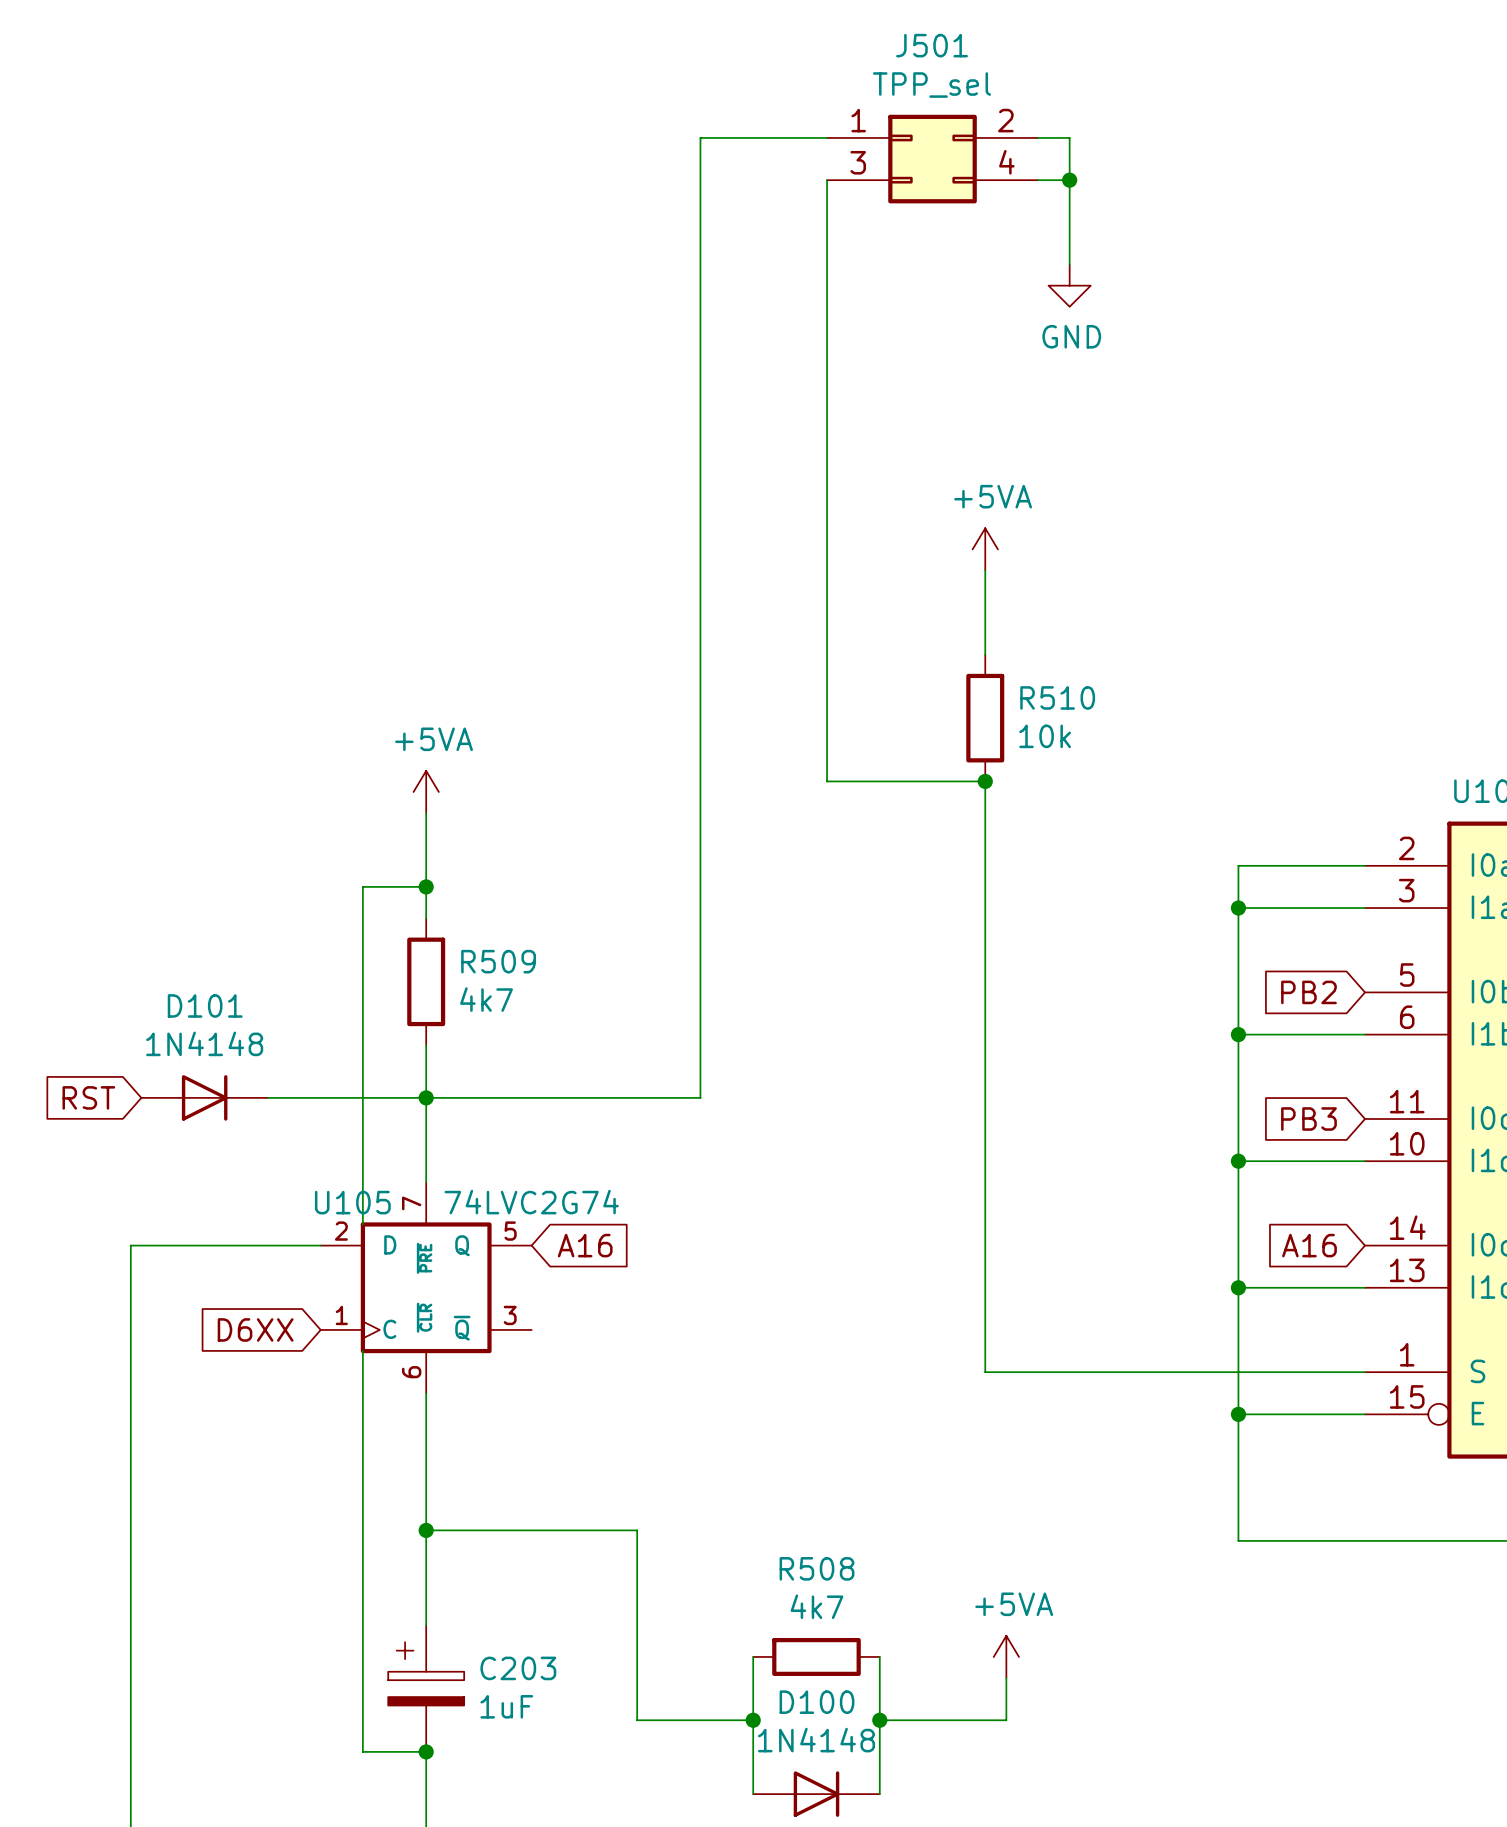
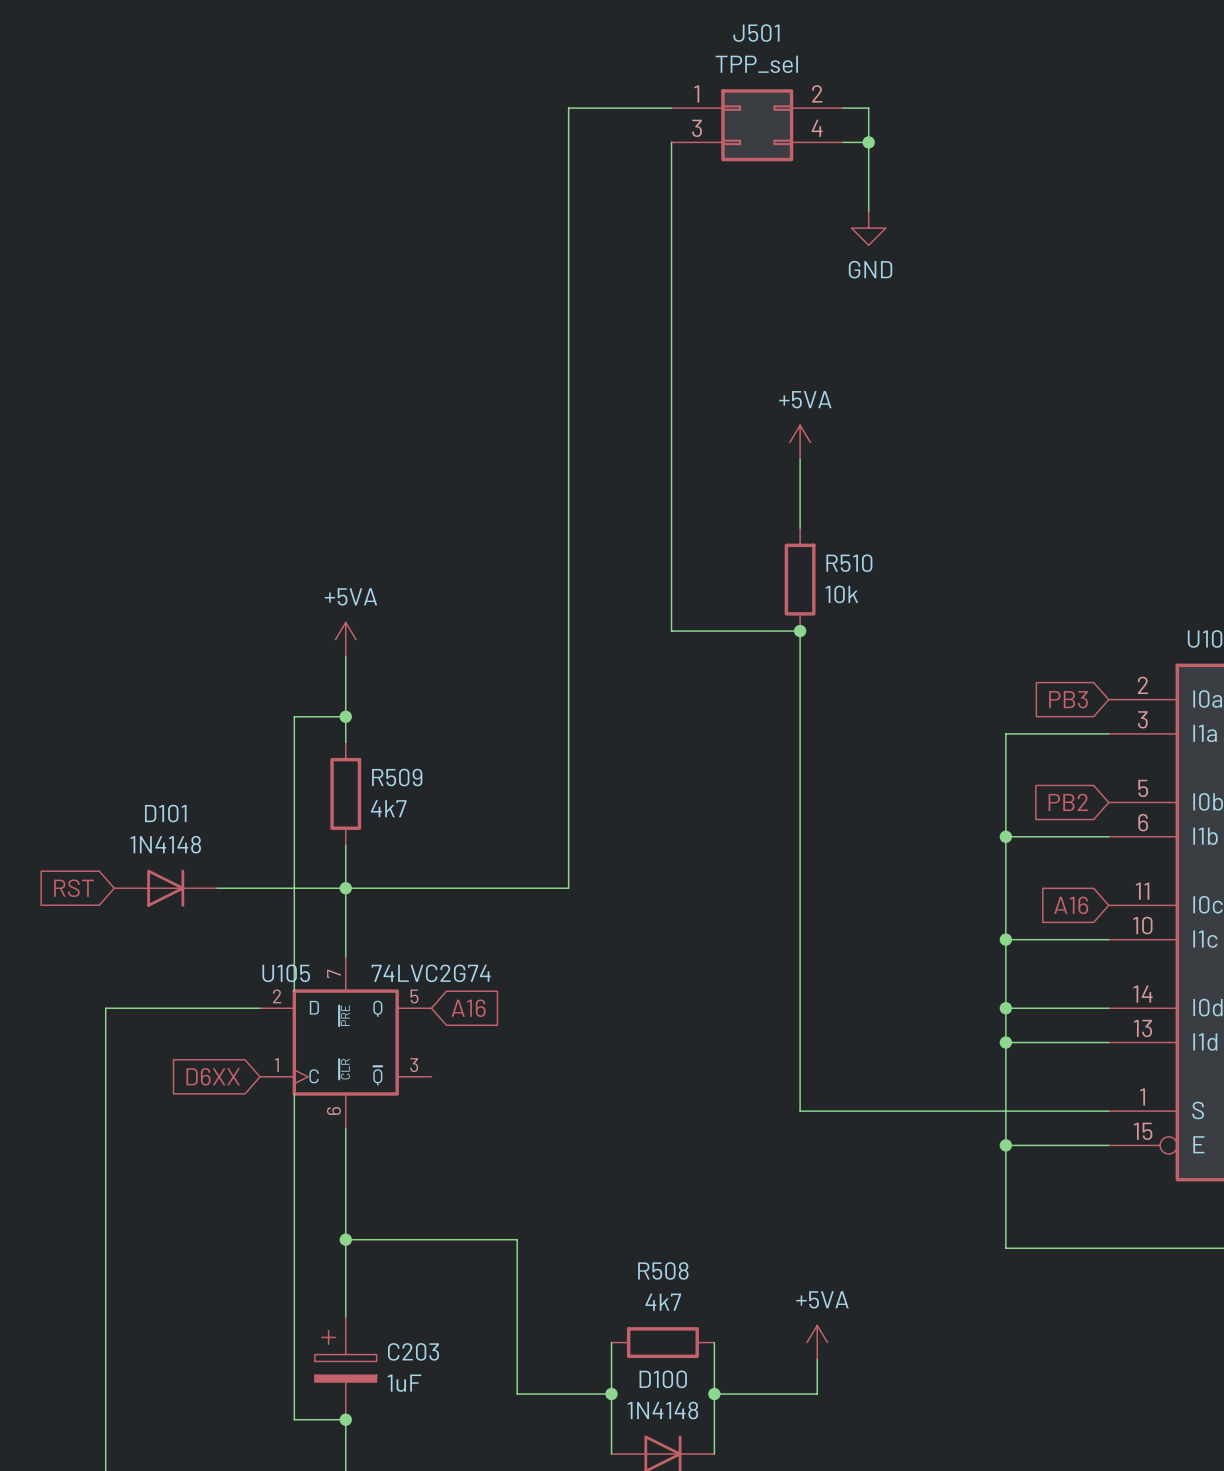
global label: none -> PB3 (1068, 699)
wire: (1365, 865) (1238, 865) (1238, 908) -> none
junction: (1238, 908) -> none
global label: PB3 (1308, 1119) -> A16 (1071, 905)
wire: none -> (1005, 1008) (1108, 1008)
junction: none -> (1005, 1008)
global label: A16 (1309, 1245) -> none

